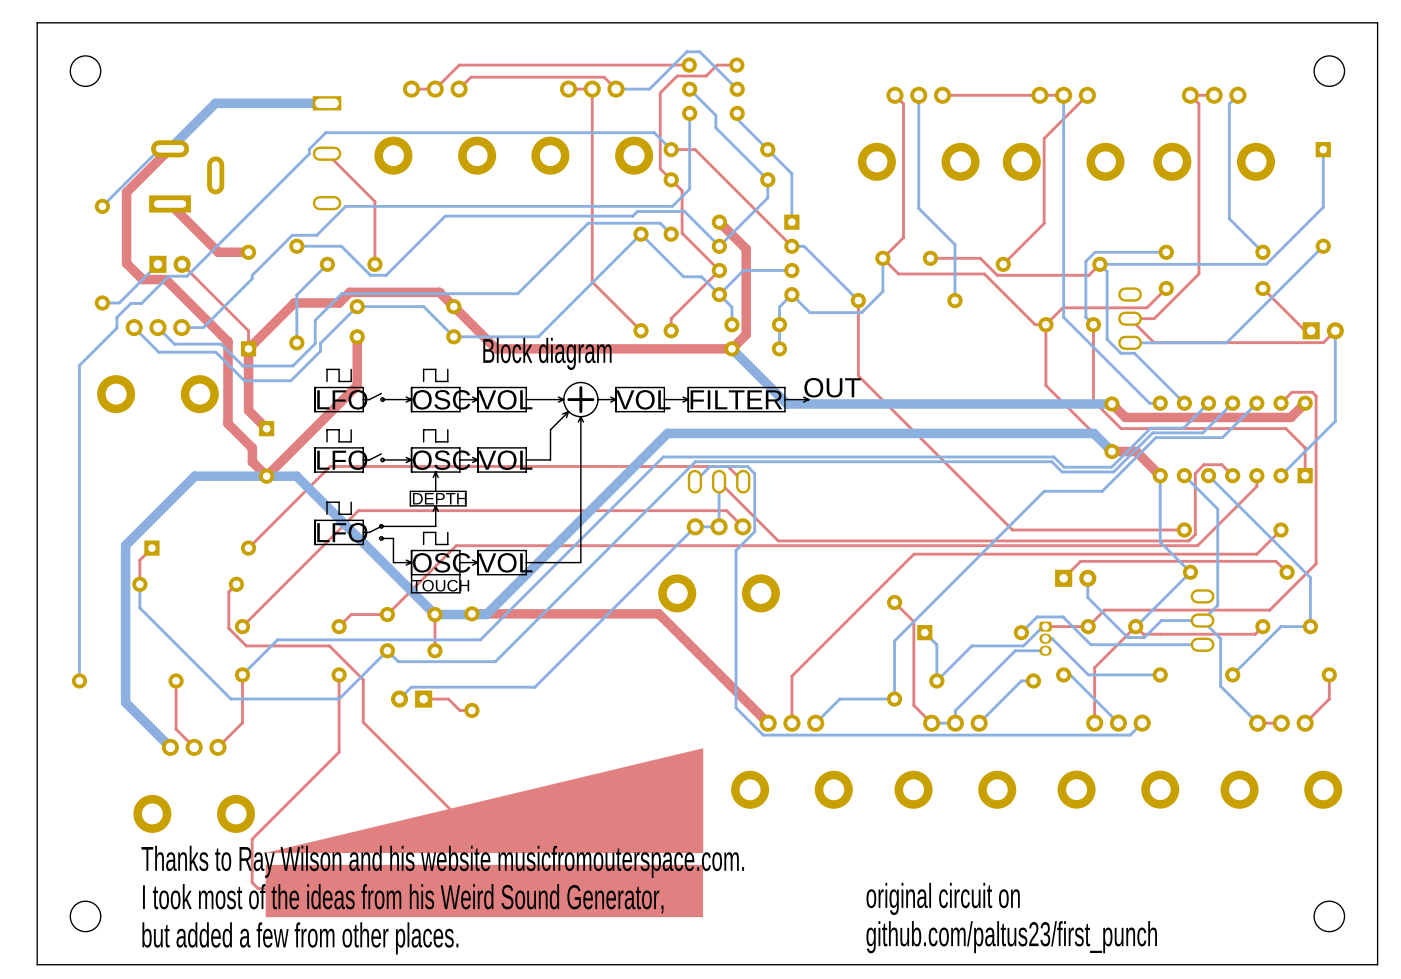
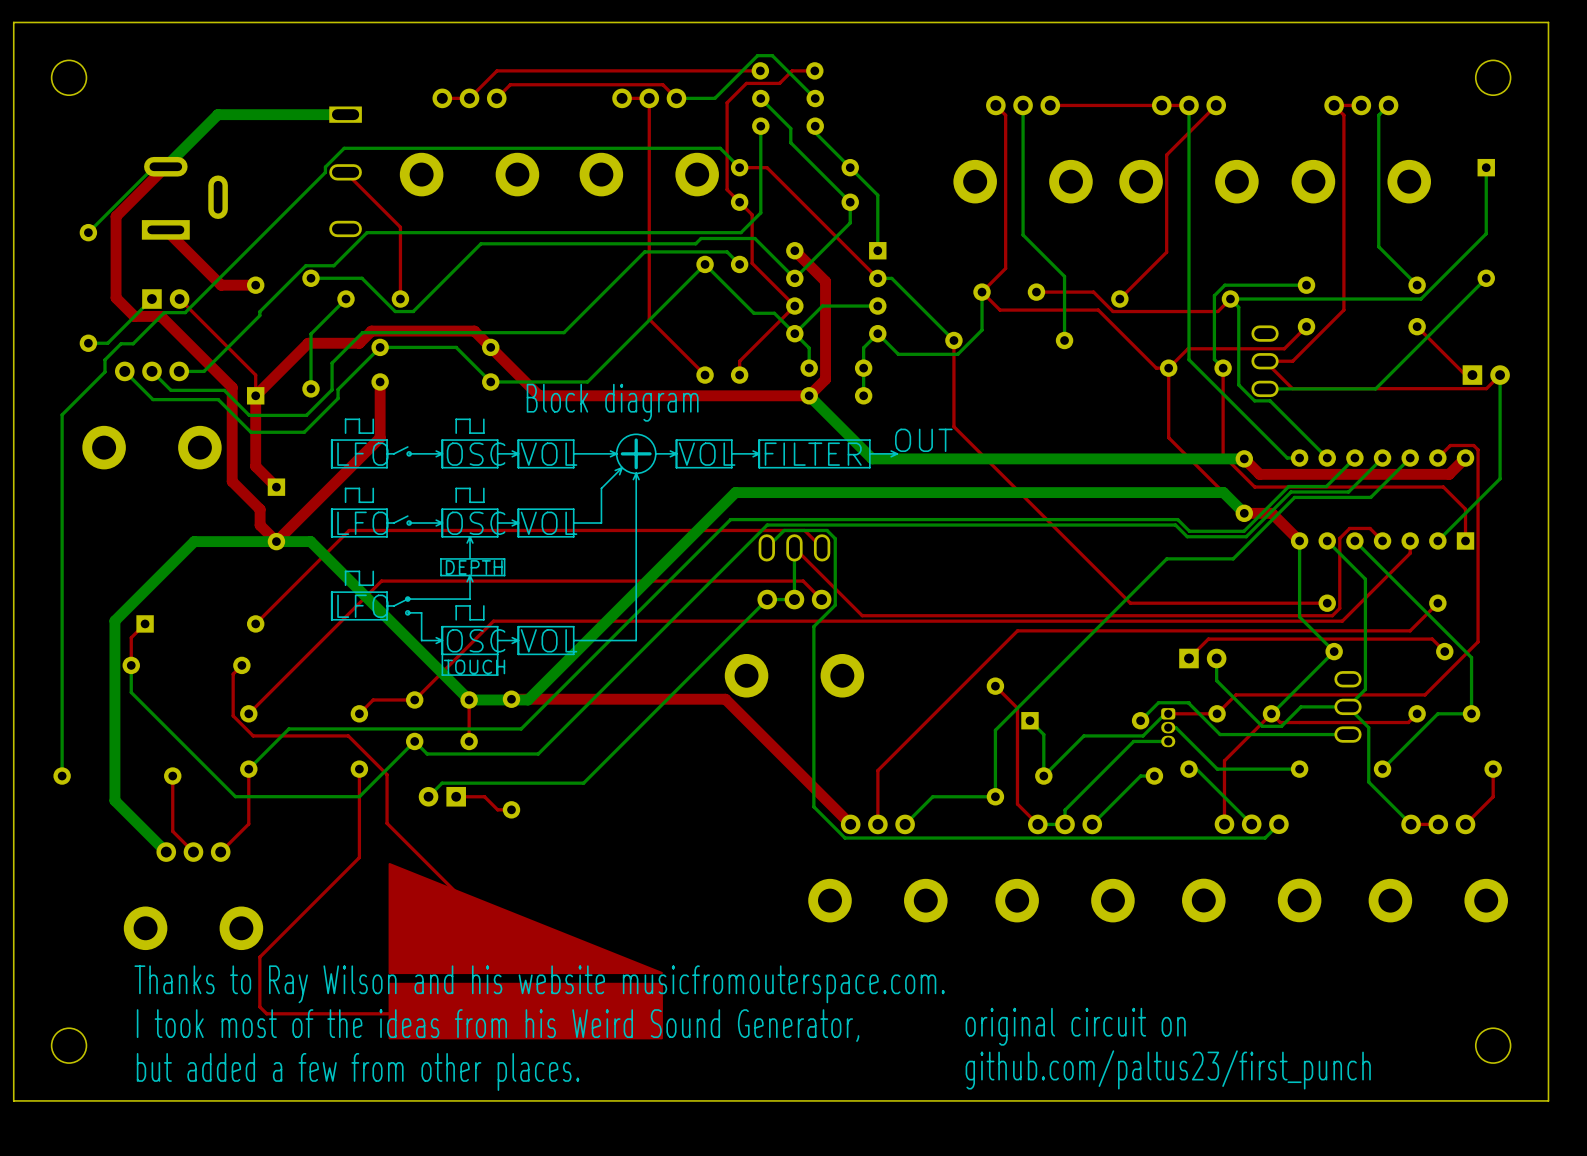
part footprint: [265, 748, 704, 918] -> [388, 863, 663, 1040]

